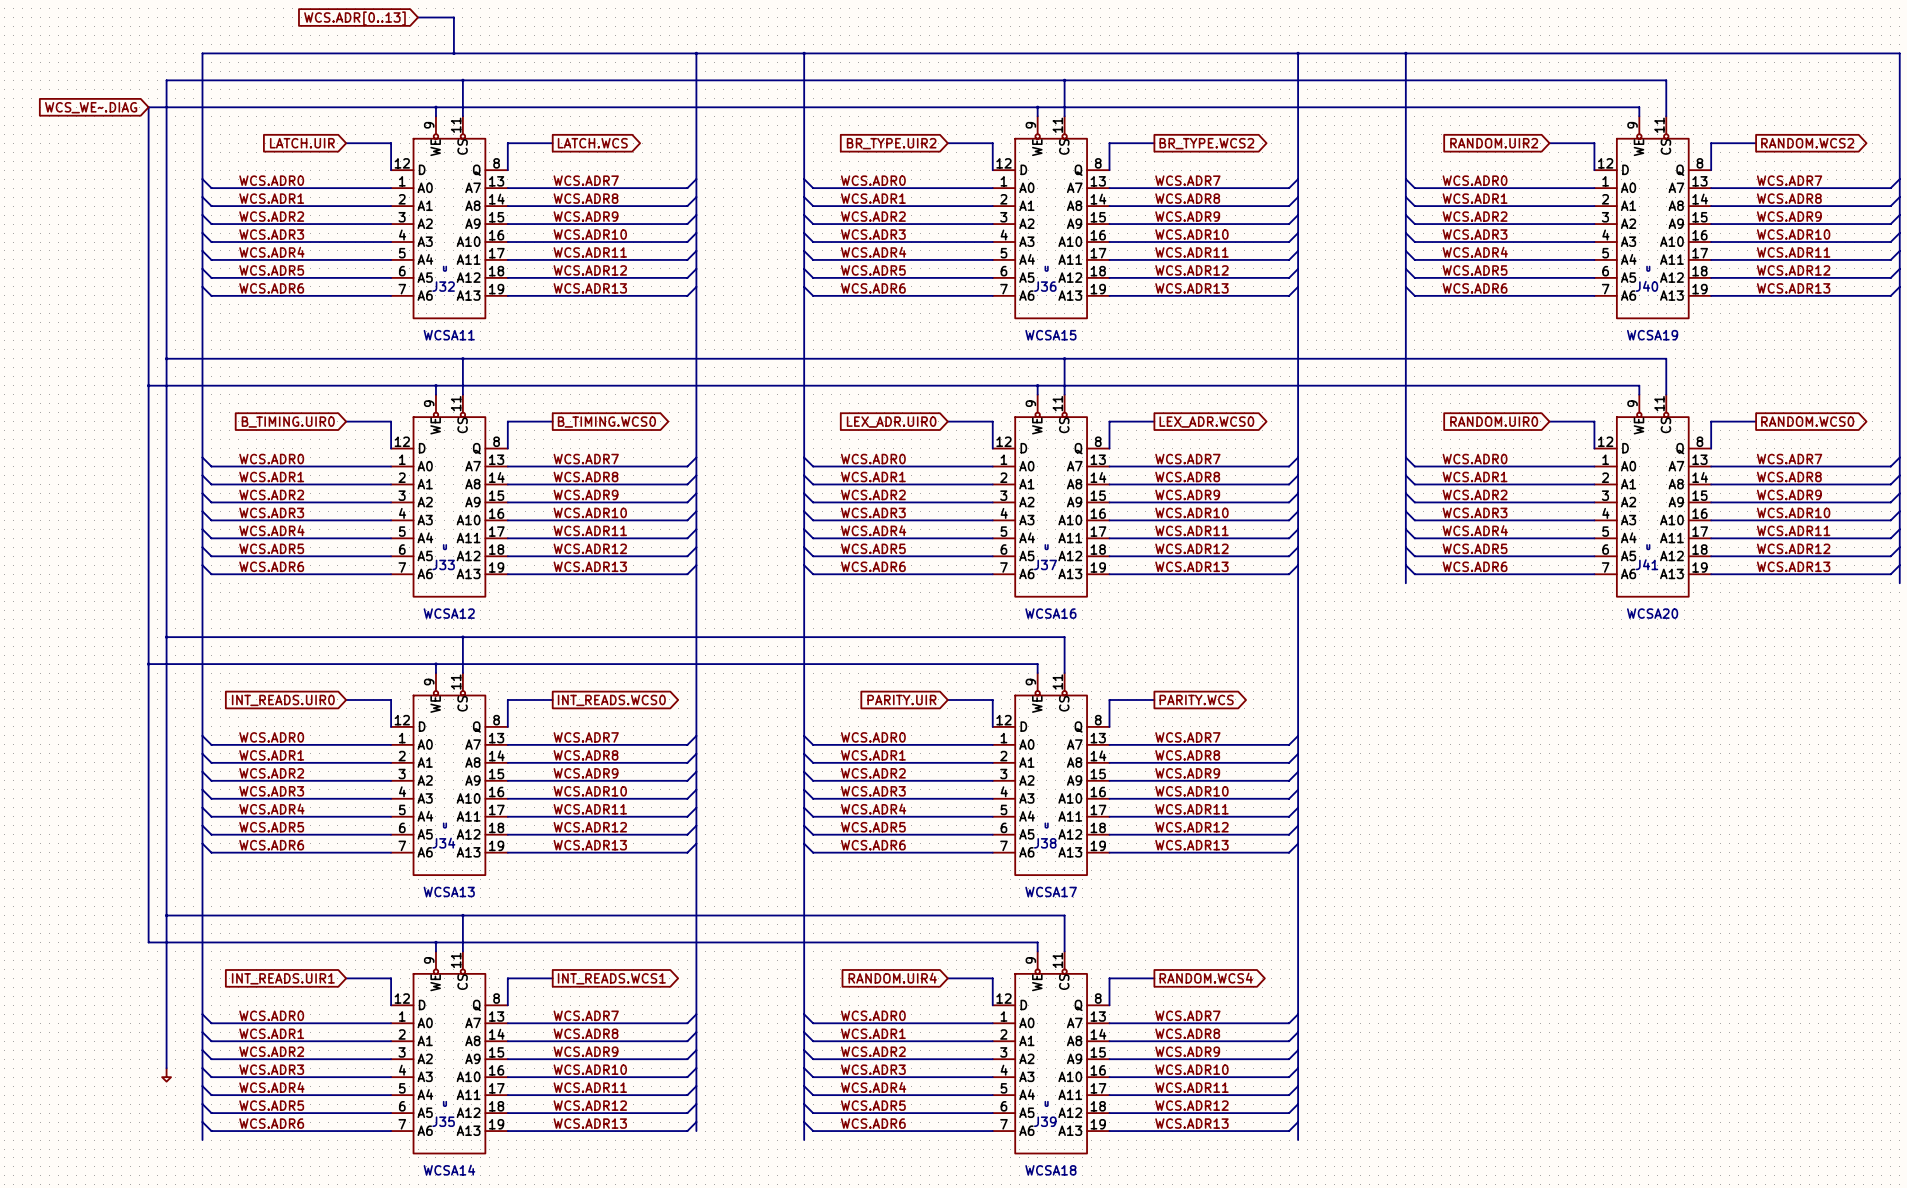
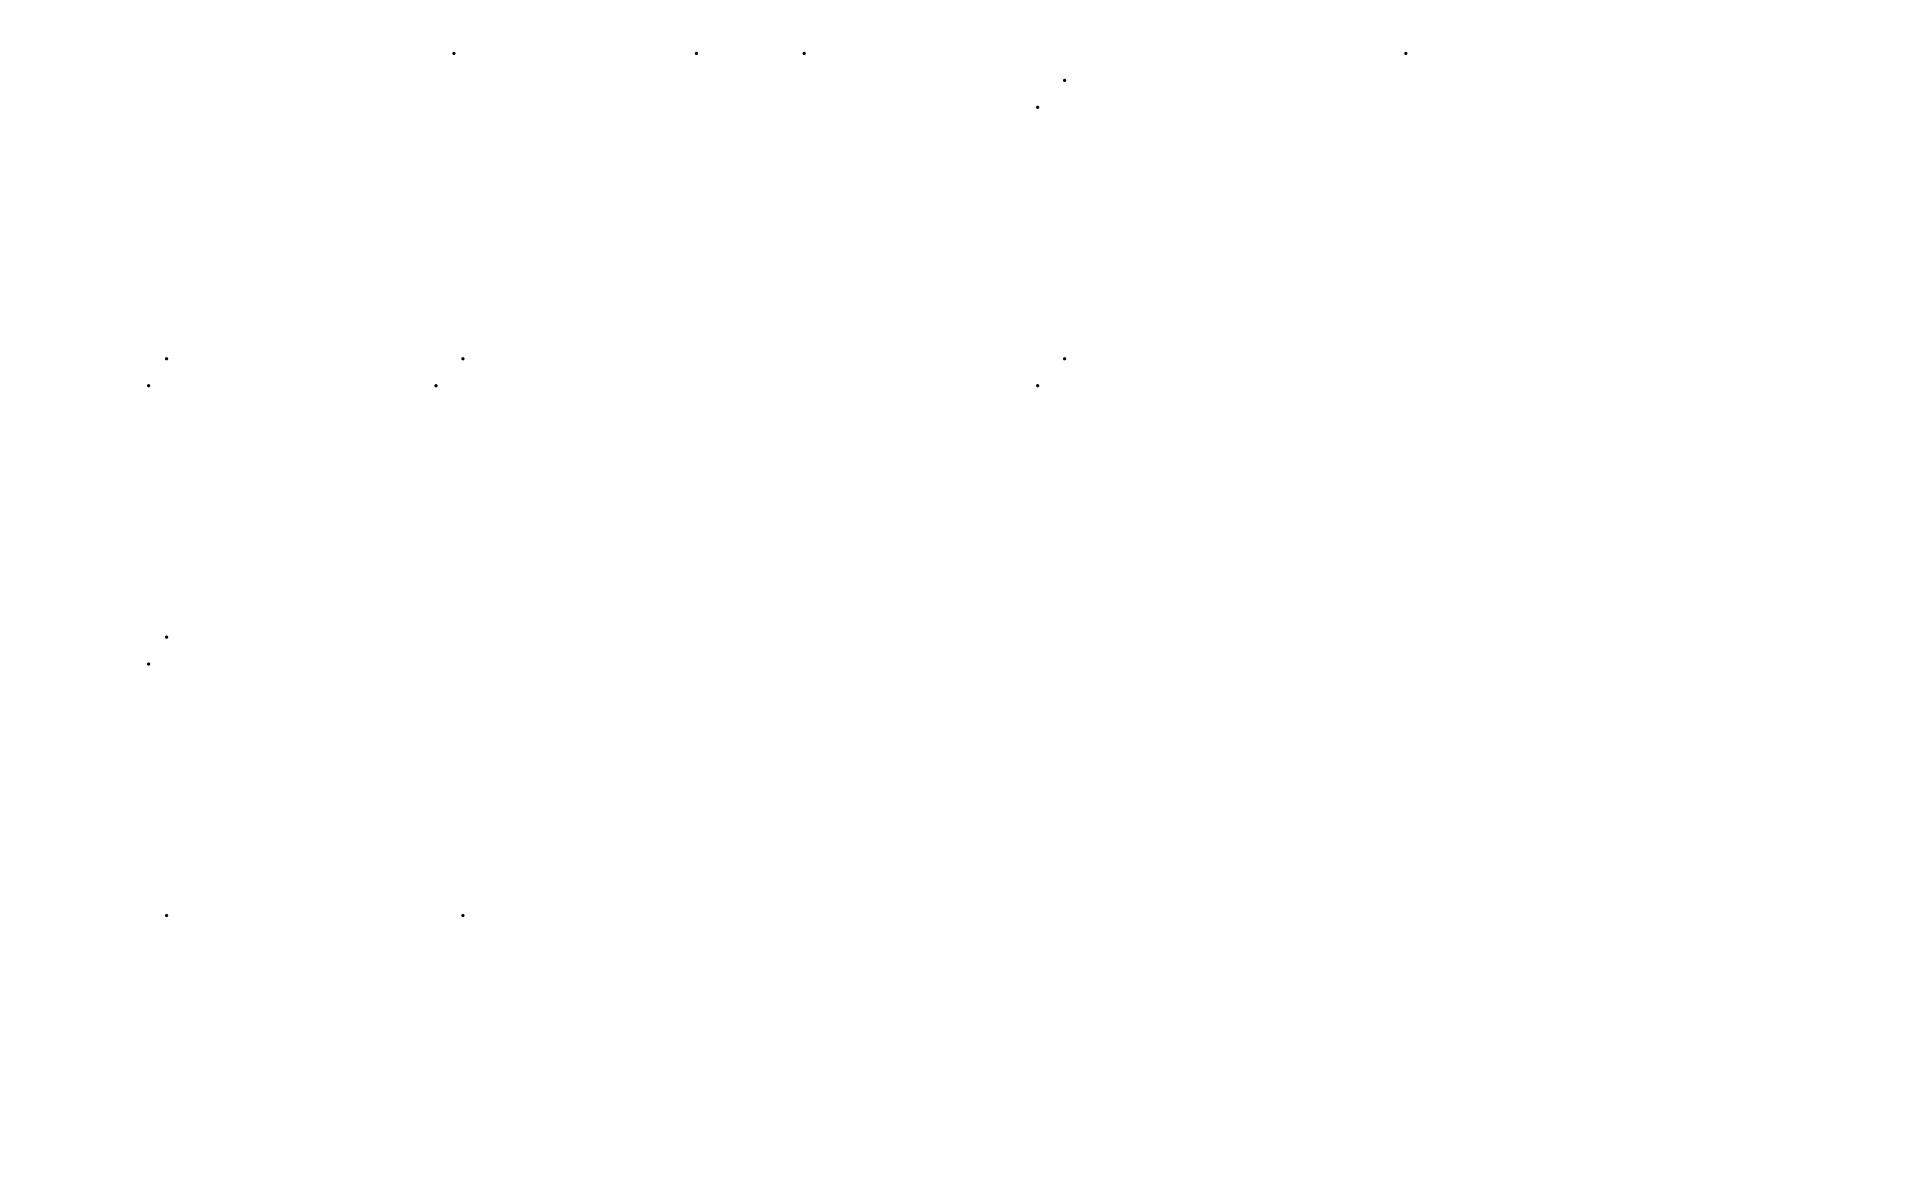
bus: (418, 17) (453, 17) (453, 53) -> none
global label: WCS.ADR[0..13] (354, 18) -> none
bus: (696, 53) (696, 1131) -> none
bus: (804, 53) (804, 1140) -> none
bus: (1298, 53) (1298, 1140) -> none
bus: (1405, 53) (1405, 583) -> none
wire: (462, 80) (462, 116) -> none
wire: (1064, 80) (1064, 116) -> none
global label: WCS_WE~.DIAG (91, 107) -> none
wire: (435, 107) (435, 116) -> none
wire: (1037, 107) (1037, 116) -> none
wire: (1639, 116) (1639, 107) (148, 107) (148, 942) (1037, 942) (1037, 951) -> none
wire: (1666, 116) (1666, 80) (166, 80) (166, 1068) -> none
global label: LATCH.UIR (302, 143) -> none
wire: (346, 143) (391, 143) (391, 170) -> none
wire: (552, 143) (507, 143) (507, 170) -> none
global label: LATCH.WCS (592, 143) -> none
global label: BR_TYPE.UIR2 (891, 143) -> none
wire: (947, 143) (992, 143) (992, 170) -> none
wire: (1154, 143) (1109, 143) (1109, 170) -> none
global label: BR_TYPE.WCS2 (1206, 143) -> none
global label: RANDOM.UIR2 (1494, 143) -> none
wire: (1549, 143) (1594, 143) (1594, 170) -> none
wire: (1756, 143) (1711, 143) (1711, 170) -> none
global label: RANDOM.WCS2 (1807, 143) -> none
wire: (202, 179) (211, 188) (391, 188) -> none
wire: (696, 179) (687, 188) (507, 188) -> none
wire: (804, 179) (813, 188) (992, 188) -> none
wire: (1298, 179) (1289, 188) (1109, 188) -> none
wire: (1405, 179) (1414, 188) (1594, 188) -> none
wire: (1899, 179) (1890, 188) (1711, 188) -> none
label: WCS.ADR0 (271, 180) -> none
label: WCS.ADR7 (586, 180) -> none
label: WCS.ADR0 (873, 180) -> none
label: WCS.ADR7 (1187, 180) -> none
label: WCS.ADR0 (1475, 180) -> none
label: WCS.ADR7 (1789, 180) -> none
wire: (202, 197) (211, 206) (391, 206) -> none
wire: (696, 197) (687, 206) (507, 206) -> none
wire: (804, 197) (813, 206) (992, 206) -> none
wire: (1298, 197) (1289, 206) (1109, 206) -> none
wire: (1405, 197) (1414, 206) (1594, 206) -> none
wire: (1899, 197) (1890, 206) (1711, 206) -> none
label: WCS.ADR1 (271, 198) -> none
label: WCS.ADR8 (586, 198) -> none
label: WCS.ADR1 (873, 198) -> none
label: WCS.ADR8 (1187, 198) -> none
label: WCS.ADR1 (1475, 198) -> none
label: WCS.ADR8 (1789, 198) -> none
wire: (202, 215) (211, 224) (391, 224) -> none
wire: (696, 215) (687, 224) (507, 224) -> none
wire: (804, 215) (813, 224) (992, 224) -> none
wire: (1298, 215) (1289, 224) (1109, 224) -> none
wire: (1405, 215) (1414, 224) (1594, 224) -> none
wire: (1899, 215) (1890, 224) (1711, 224) -> none
label: WCS.ADR2 (271, 216) -> none
label: WCS.ADR9 (586, 216) -> none
label: WCS.ADR2 (873, 216) -> none
label: WCS.ADR9 (1187, 216) -> none
label: WCS.ADR2 (1475, 216) -> none
label: WCS.ADR9 (1789, 216) -> none
part: (449, 217) -> none
part: (1051, 217) -> none
part: (1652, 217) -> none
wire: (202, 233) (211, 242) (391, 242) -> none
wire: (696, 233) (687, 242) (507, 242) -> none
wire: (804, 233) (813, 242) (992, 242) -> none
wire: (1298, 233) (1289, 242) (1109, 242) -> none
wire: (1405, 233) (1414, 242) (1594, 242) -> none
wire: (1899, 233) (1890, 242) (1711, 242) -> none
label: WCS.ADR3 (271, 234) -> none
label: WCS.ADR10 (590, 234) -> none
label: WCS.ADR3 (873, 234) -> none
label: WCS.ADR10 (1191, 234) -> none
label: WCS.ADR3 (1475, 234) -> none
label: WCS.ADR10 (1793, 234) -> none
wire: (202, 250) (211, 259) (391, 259) -> none
wire: (696, 250) (687, 259) (507, 259) -> none
wire: (804, 250) (813, 259) (992, 259) -> none
wire: (1298, 250) (1289, 259) (1109, 259) -> none
wire: (1405, 250) (1414, 259) (1594, 259) -> none
wire: (1899, 250) (1890, 259) (1711, 259) -> none
label: WCS.ADR4 (271, 252) -> none
label: WCS.ADR11 (590, 252) -> none
label: WCS.ADR4 (873, 252) -> none
label: WCS.ADR11 (1191, 252) -> none
label: WCS.ADR4 (1475, 252) -> none
label: WCS.ADR11 (1793, 252) -> none
wire: (202, 268) (211, 277) (391, 277) -> none
wire: (696, 268) (687, 277) (507, 277) -> none
wire: (804, 268) (813, 277) (992, 277) -> none
wire: (1298, 268) (1289, 277) (1109, 277) -> none
wire: (1405, 268) (1414, 277) (1594, 277) -> none
wire: (1899, 268) (1890, 277) (1711, 277) -> none
label: WCS.ADR5 (271, 270) -> none
label: WCS.ADR12 (590, 270) -> none
label: WCS.ADR5 (873, 270) -> none
label: WCS.ADR12 (1191, 270) -> none
label: WCS.ADR5 (1475, 270) -> none
label: WCS.ADR12 (1793, 270) -> none
wire: (202, 286) (211, 295) (391, 295) -> none
wire: (696, 286) (687, 295) (507, 295) -> none
wire: (804, 286) (813, 295) (992, 295) -> none
wire: (1298, 286) (1289, 295) (1109, 295) -> none
wire: (1405, 286) (1414, 295) (1594, 295) -> none
wire: (1899, 286) (1890, 295) (1711, 295) -> none
label: WCS.ADR6 (271, 288) -> none
label: WCS.ADR13 (590, 288) -> none
label: WCS.ADR6 (873, 288) -> none
label: WCS.ADR13 (1191, 288) -> none
label: WCS.ADR6 (1475, 288) -> none
label: WCS.ADR13 (1793, 288) -> none
wire: (166, 358) (1666, 358) (1666, 394) -> none
wire: (462, 358) (462, 394) -> none
wire: (1064, 358) (1064, 394) -> none
wire: (148, 385) (1639, 385) (1639, 394) -> none
wire: (435, 385) (435, 394) -> none
wire: (1037, 385) (1037, 394) -> none
wire: (346, 421) (391, 421) (391, 448) -> none
wire: (552, 421) (507, 421) (507, 448) -> none
wire: (947, 421) (992, 421) (992, 448) -> none
wire: (1154, 421) (1109, 421) (1109, 448) -> none
global label: RANDOM.UIR0 (1494, 421) -> none
wire: (1549, 421) (1594, 421) (1594, 448) -> none
wire: (1756, 421) (1711, 421) (1711, 448) -> none
global label: RANDOM.WCS0 (1807, 421) -> none
global label: B_TIMING.UIR0 (288, 422) -> none
global label: B_TIMING.WCS0 (606, 422) -> none
global label: LEX_ADR.UIR0 (891, 422) -> none
global label: LEX_ADR.WCS0 (1206, 422) -> none
wire: (202, 457) (211, 466) (391, 466) -> none
wire: (696, 457) (687, 466) (507, 466) -> none
wire: (804, 457) (813, 466) (992, 466) -> none
wire: (1298, 457) (1289, 466) (1109, 466) -> none
wire: (1405, 457) (1414, 466) (1594, 466) -> none
wire: (1899, 457) (1890, 466) (1711, 466) -> none
label: WCS.ADR0 (271, 459) -> none
label: WCS.ADR7 (586, 459) -> none
label: WCS.ADR0 (873, 459) -> none
label: WCS.ADR7 (1187, 459) -> none
label: WCS.ADR0 (1475, 459) -> none
label: WCS.ADR7 (1789, 459) -> none
wire: (202, 475) (211, 484) (391, 484) -> none
wire: (696, 475) (687, 484) (507, 484) -> none
wire: (804, 475) (813, 484) (992, 484) -> none
wire: (1298, 475) (1289, 484) (1109, 484) -> none
wire: (1405, 475) (1414, 484) (1594, 484) -> none
wire: (1899, 475) (1890, 484) (1711, 484) -> none
label: WCS.ADR1 (271, 476) -> none
label: WCS.ADR8 (586, 476) -> none
label: WCS.ADR1 (873, 476) -> none
label: WCS.ADR8 (1187, 476) -> none
label: WCS.ADR1 (1475, 476) -> none
label: WCS.ADR8 (1789, 476) -> none
wire: (202, 493) (211, 502) (391, 502) -> none
wire: (696, 493) (687, 502) (507, 502) -> none
wire: (804, 493) (813, 502) (992, 502) -> none
wire: (1298, 493) (1289, 502) (1109, 502) -> none
wire: (1405, 493) (1414, 502) (1594, 502) -> none
wire: (1899, 493) (1890, 502) (1711, 502) -> none
label: WCS.ADR2 (271, 494) -> none
label: WCS.ADR9 (586, 494) -> none
label: WCS.ADR2 (873, 494) -> none
label: WCS.ADR9 (1187, 494) -> none
label: WCS.ADR2 (1475, 494) -> none
label: WCS.ADR9 (1789, 494) -> none
part: (449, 495) -> none
part: (1051, 495) -> none
part: (1652, 495) -> none
wire: (202, 511) (211, 520) (391, 520) -> none
wire: (696, 511) (687, 520) (507, 520) -> none
wire: (804, 511) (813, 520) (992, 520) -> none
wire: (1298, 511) (1289, 520) (1109, 520) -> none
wire: (1405, 511) (1414, 520) (1594, 520) -> none
wire: (1899, 511) (1890, 520) (1711, 520) -> none
label: WCS.ADR3 (271, 512) -> none
label: WCS.ADR10 (590, 512) -> none
label: WCS.ADR3 (873, 512) -> none
label: WCS.ADR10 (1191, 512) -> none
label: WCS.ADR3 (1475, 512) -> none
label: WCS.ADR10 (1793, 512) -> none
wire: (202, 529) (211, 538) (391, 538) -> none
wire: (696, 529) (687, 538) (507, 538) -> none
wire: (804, 529) (813, 538) (992, 538) -> none
wire: (1298, 529) (1289, 538) (1109, 538) -> none
wire: (1405, 529) (1414, 538) (1594, 538) -> none
wire: (1899, 529) (1890, 538) (1711, 538) -> none
label: WCS.ADR4 (271, 530) -> none
label: WCS.ADR11 (590, 530) -> none
label: WCS.ADR4 (873, 530) -> none
label: WCS.ADR11 (1191, 530) -> none
label: WCS.ADR4 (1475, 530) -> none
label: WCS.ADR11 (1793, 530) -> none
wire: (202, 547) (211, 556) (391, 556) -> none
wire: (696, 547) (687, 556) (507, 556) -> none
wire: (804, 547) (813, 556) (992, 556) -> none
wire: (1298, 547) (1289, 556) (1109, 556) -> none
wire: (1405, 547) (1414, 556) (1594, 556) -> none
wire: (1899, 547) (1890, 556) (1711, 556) -> none
label: WCS.ADR5 (271, 548) -> none
label: WCS.ADR12 (590, 548) -> none
label: WCS.ADR5 (873, 548) -> none
label: WCS.ADR12 (1191, 548) -> none
label: WCS.ADR5 (1475, 548) -> none
label: WCS.ADR12 (1793, 548) -> none
wire: (202, 565) (211, 574) (391, 574) -> none
wire: (696, 565) (687, 574) (507, 574) -> none
wire: (804, 565) (813, 574) (992, 574) -> none
wire: (1298, 565) (1289, 574) (1109, 574) -> none
wire: (1405, 565) (1414, 574) (1594, 574) -> none
wire: (1899, 565) (1890, 574) (1711, 574) -> none
label: WCS.ADR6 (271, 566) -> none
label: WCS.ADR13 (590, 566) -> none
label: WCS.ADR6 (873, 566) -> none
label: WCS.ADR13 (1191, 566) -> none
label: WCS.ADR6 (1475, 566) -> none
label: WCS.ADR13 (1793, 566) -> none
bus: (1899, 583) (1899, 53) (202, 53) (202, 1140) -> none
wire: (166, 637) (1064, 637) (1064, 673) -> none
wire: (462, 637) (462, 673) -> none
wire: (148, 664) (1037, 664) (1037, 673) -> none
wire: (435, 664) (435, 673) -> none
wire: (346, 699) (391, 699) (391, 726) -> none
wire: (552, 699) (507, 699) (507, 726) -> none
global label: PARITY.UIR (901, 699) -> none
wire: (947, 699) (992, 699) (992, 726) -> none
wire: (1154, 699) (1109, 699) (1109, 726) -> none
global label: PARITY.WCS (1196, 699) -> none
global label: INT_READS.UIR0 (283, 700) -> none
global label: INT_READS.WCS0 (611, 700) -> none
wire: (202, 735) (211, 744) (391, 744) -> none
wire: (696, 735) (687, 744) (507, 744) -> none
wire: (804, 735) (813, 744) (992, 744) -> none
wire: (1298, 735) (1289, 744) (1109, 744) -> none
label: WCS.ADR0 (271, 737) -> none
label: WCS.ADR7 (586, 737) -> none
label: WCS.ADR0 (873, 737) -> none
label: WCS.ADR7 (1187, 737) -> none
wire: (202, 753) (211, 762) (391, 762) -> none
wire: (696, 753) (687, 762) (507, 762) -> none
wire: (804, 753) (813, 762) (992, 762) -> none
wire: (1298, 753) (1289, 762) (1109, 762) -> none
label: WCS.ADR1 (271, 755) -> none
label: WCS.ADR8 (586, 755) -> none
label: WCS.ADR1 (873, 755) -> none
label: WCS.ADR8 (1187, 755) -> none
wire: (202, 771) (211, 780) (391, 780) -> none
wire: (696, 771) (687, 780) (507, 780) -> none
wire: (804, 771) (813, 780) (992, 780) -> none
wire: (1298, 771) (1289, 780) (1109, 780) -> none
label: WCS.ADR2 (271, 773) -> none
label: WCS.ADR9 (586, 773) -> none
label: WCS.ADR2 (873, 773) -> none
label: WCS.ADR9 (1187, 773) -> none
part: (449, 774) -> none
part: (1051, 774) -> none
wire: (202, 789) (211, 798) (391, 798) -> none
wire: (696, 789) (687, 798) (507, 798) -> none
wire: (804, 789) (813, 798) (992, 798) -> none
wire: (1298, 789) (1289, 798) (1109, 798) -> none
label: WCS.ADR3 (271, 791) -> none
label: WCS.ADR10 (590, 791) -> none
label: WCS.ADR3 (873, 791) -> none
label: WCS.ADR10 (1191, 791) -> none
wire: (202, 807) (211, 816) (391, 816) -> none
wire: (696, 807) (687, 816) (507, 816) -> none
wire: (804, 807) (813, 816) (992, 816) -> none
wire: (1298, 807) (1289, 816) (1109, 816) -> none
label: WCS.ADR4 (271, 809) -> none
label: WCS.ADR11 (590, 809) -> none
label: WCS.ADR4 (873, 809) -> none
label: WCS.ADR11 (1191, 809) -> none
wire: (202, 825) (211, 834) (391, 834) -> none
wire: (696, 825) (687, 834) (507, 834) -> none
wire: (804, 825) (813, 834) (992, 834) -> none
wire: (1298, 825) (1289, 834) (1109, 834) -> none
label: WCS.ADR5 (271, 827) -> none
label: WCS.ADR12 (590, 827) -> none
label: WCS.ADR5 (873, 827) -> none
label: WCS.ADR12 (1191, 827) -> none
wire: (202, 843) (211, 852) (391, 852) -> none
wire: (696, 843) (687, 852) (507, 852) -> none
wire: (804, 843) (813, 852) (992, 852) -> none
wire: (1298, 843) (1289, 852) (1109, 852) -> none
label: WCS.ADR6 (271, 845) -> none
label: WCS.ADR13 (590, 845) -> none
label: WCS.ADR6 (873, 845) -> none
label: WCS.ADR13 (1191, 845) -> none
wire: (166, 915) (1064, 915) (1064, 951) -> none
wire: (462, 915) (462, 951) -> none
wire: (435, 942) (435, 951) -> none
global label: INT_READS.UIR1 (283, 978) -> none
wire: (346, 978) (391, 978) (391, 1005) -> none
wire: (552, 978) (507, 978) (507, 1005) -> none
global label: INT_READS.WCS1 (611, 978) -> none
global label: RANDOM.UIR4 (892, 978) -> none
wire: (947, 978) (992, 978) (992, 1005) -> none
wire: (1154, 978) (1109, 978) (1109, 1005) -> none
global label: RANDOM.WCS4 (1206, 978) -> none
wire: (202, 1014) (211, 1023) (391, 1023) -> none
wire: (696, 1014) (687, 1023) (507, 1023) -> none
wire: (804, 1014) (813, 1023) (992, 1023) -> none
wire: (1298, 1014) (1289, 1023) (1109, 1023) -> none
label: WCS.ADR0 (271, 1015) -> none
label: WCS.ADR7 (586, 1015) -> none
label: WCS.ADR0 (873, 1015) -> none
label: WCS.ADR7 (1187, 1015) -> none
wire: (202, 1032) (211, 1041) (391, 1041) -> none
wire: (696, 1032) (687, 1041) (507, 1041) -> none
wire: (804, 1032) (813, 1041) (992, 1041) -> none
wire: (1298, 1032) (1289, 1041) (1109, 1041) -> none
label: WCS.ADR1 (271, 1033) -> none
label: WCS.ADR8 (586, 1033) -> none
label: WCS.ADR1 (873, 1033) -> none
label: WCS.ADR8 (1187, 1033) -> none
wire: (202, 1050) (211, 1059) (391, 1059) -> none
wire: (696, 1050) (687, 1059) (507, 1059) -> none
wire: (804, 1050) (813, 1059) (992, 1059) -> none
wire: (1298, 1050) (1289, 1059) (1109, 1059) -> none
label: WCS.ADR2 (271, 1051) -> none
label: WCS.ADR9 (586, 1051) -> none
label: WCS.ADR2 (873, 1051) -> none
label: WCS.ADR9 (1187, 1051) -> none
part: (449, 1052) -> none
part: (1051, 1052) -> none
wire: (202, 1068) (211, 1077) (391, 1077) -> none
wire: (696, 1068) (687, 1077) (507, 1077) -> none
wire: (804, 1068) (813, 1077) (992, 1077) -> none
wire: (1298, 1068) (1289, 1077) (1109, 1077) -> none
label: WCS.ADR3 (271, 1069) -> none
label: WCS.ADR10 (590, 1069) -> none
label: WCS.ADR3 (873, 1069) -> none
label: WCS.ADR10 (1191, 1069) -> none
power symbol: (166, 1075) -> none
wire: (202, 1086) (211, 1095) (391, 1095) -> none
wire: (696, 1086) (687, 1095) (507, 1095) -> none
wire: (804, 1086) (813, 1095) (992, 1095) -> none
wire: (1298, 1086) (1289, 1095) (1109, 1095) -> none
label: WCS.ADR4 (271, 1087) -> none
label: WCS.ADR11 (590, 1087) -> none
label: WCS.ADR4 (873, 1087) -> none
label: WCS.ADR11 (1191, 1087) -> none
wire: (202, 1104) (211, 1113) (391, 1113) -> none
wire: (696, 1104) (687, 1113) (507, 1113) -> none
wire: (804, 1104) (813, 1113) (992, 1113) -> none
wire: (1298, 1104) (1289, 1113) (1109, 1113) -> none
label: WCS.ADR5 (271, 1105) -> none
label: WCS.ADR12 (590, 1105) -> none
label: WCS.ADR5 (873, 1105) -> none
label: WCS.ADR12 (1191, 1105) -> none
wire: (202, 1122) (211, 1131) (391, 1131) -> none
wire: (696, 1122) (687, 1131) (507, 1131) -> none
wire: (804, 1122) (813, 1131) (992, 1131) -> none
wire: (1298, 1122) (1289, 1131) (1109, 1131) -> none
label: WCS.ADR6 (271, 1123) -> none
label: WCS.ADR13 (590, 1123) -> none
label: WCS.ADR6 (873, 1123) -> none
label: WCS.ADR13 (1191, 1123) -> none

